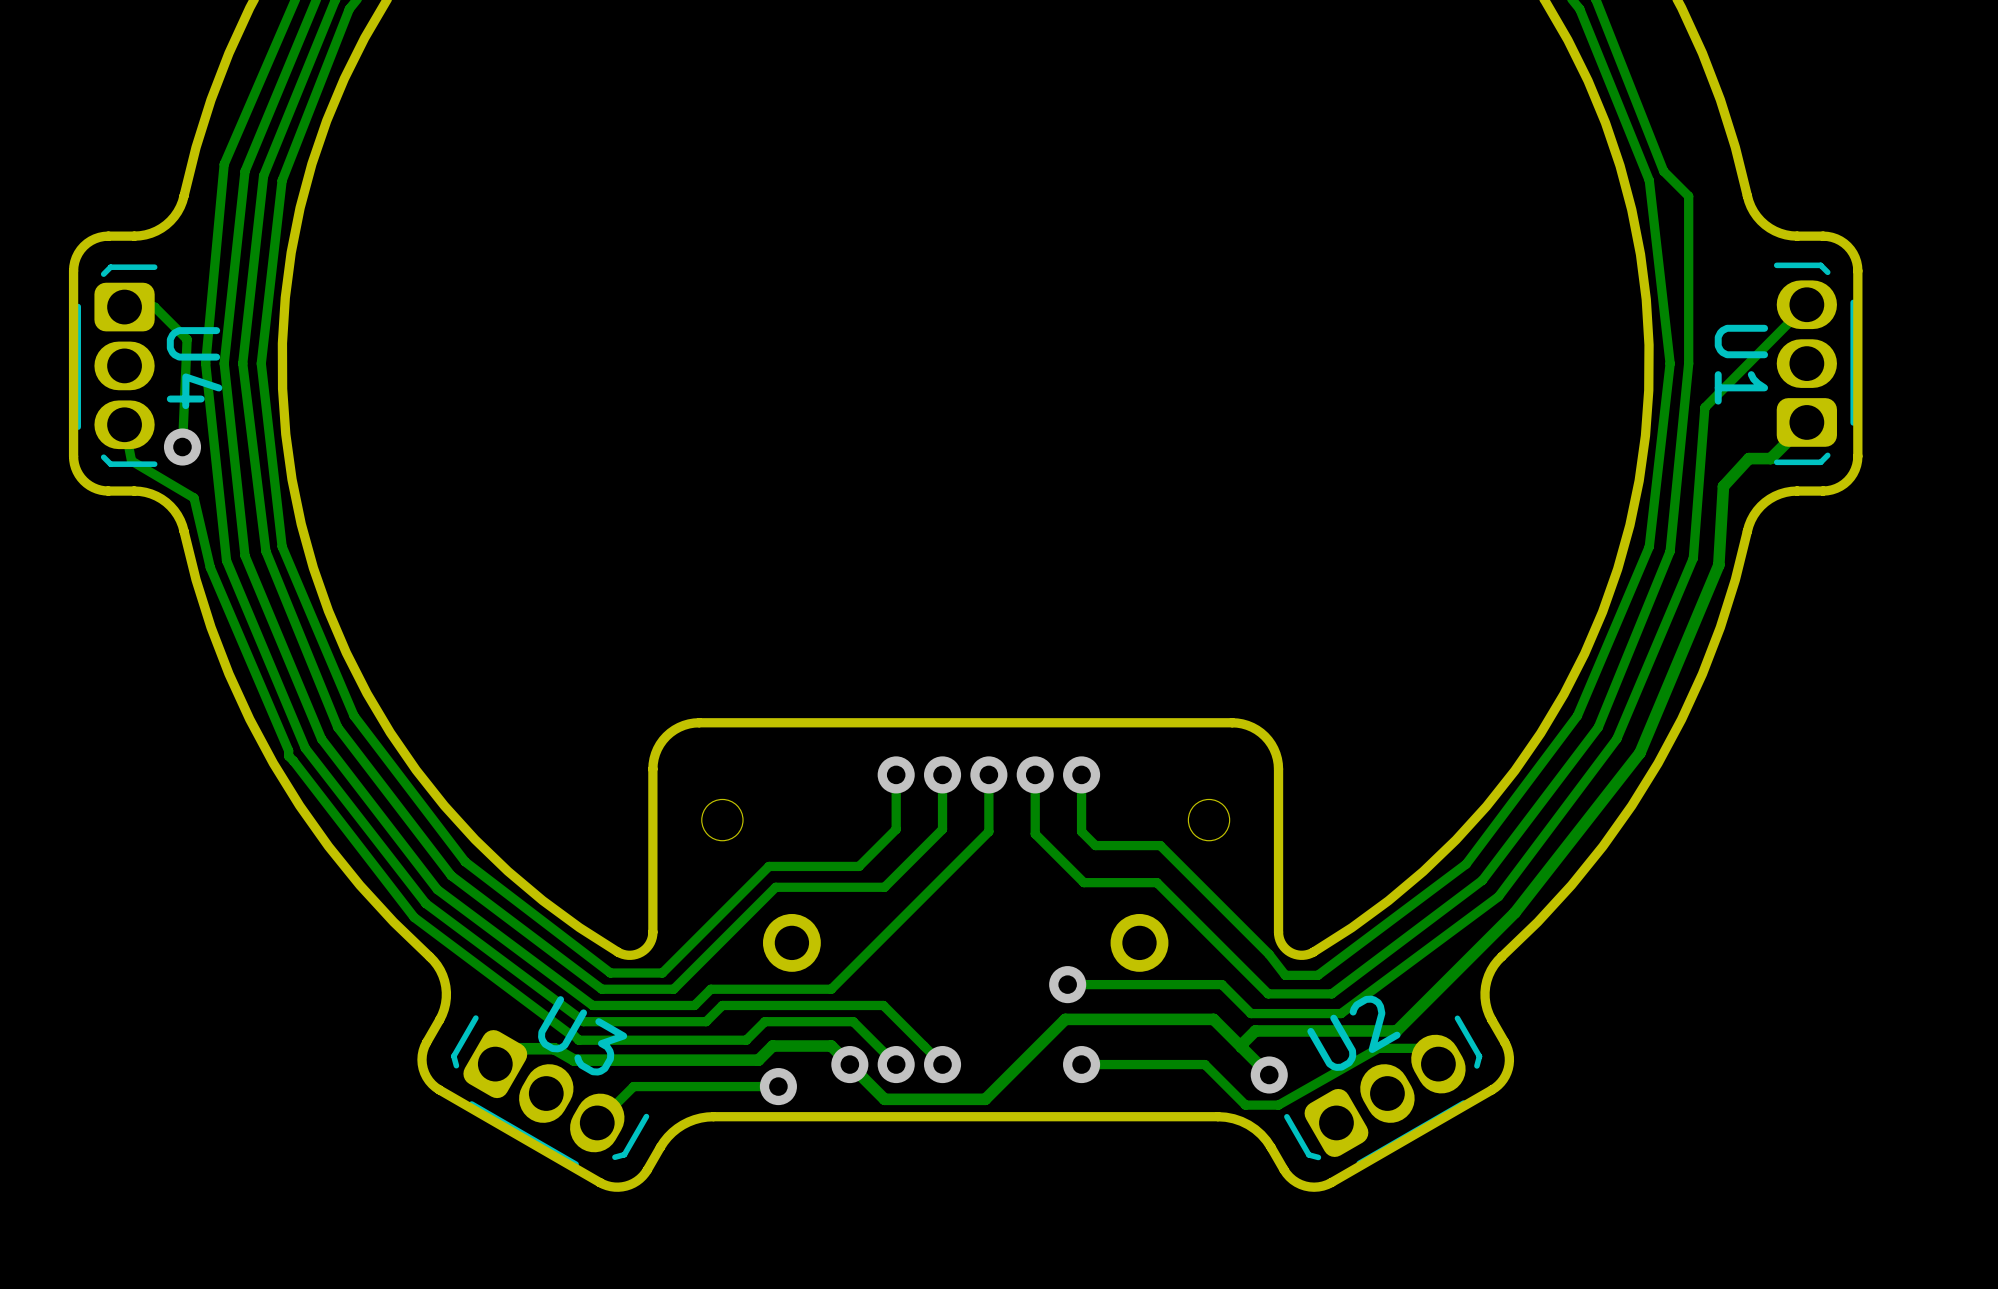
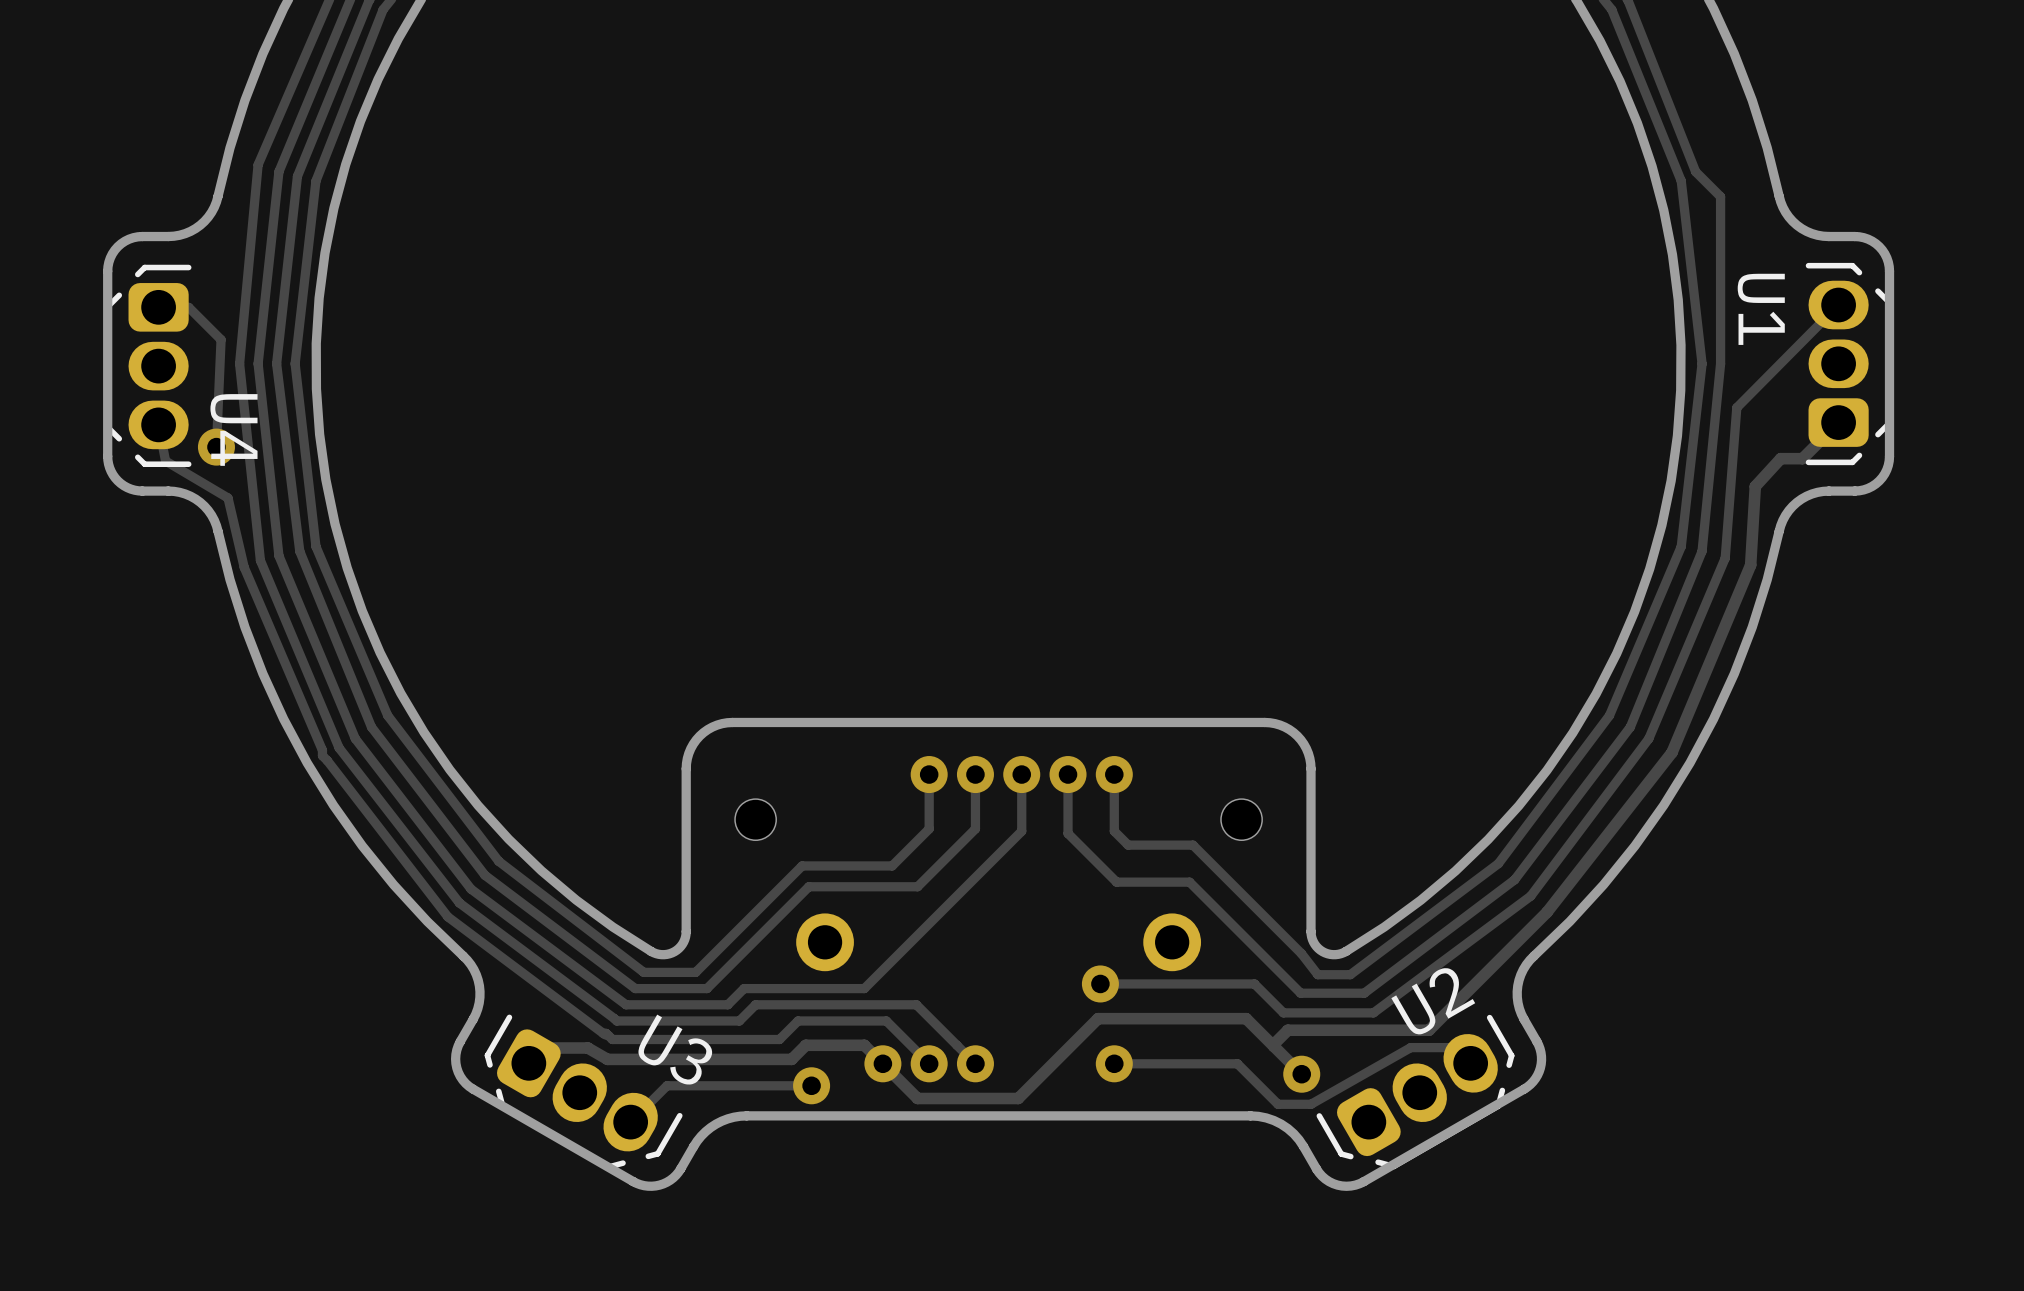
U1 footprint: [1773, 262, 1856, 466] -> [1805, 262, 1893, 466]
U4 footprint: [75, 264, 158, 467] -> [104, 264, 192, 468]
U1 name position: U1 (1741, 364) -> U1 (1761, 309)
U4 name position: U4 (194, 368) -> U4 (233, 429)
U3 footprint: [451, 1015, 650, 1168] -> [484, 1014, 683, 1171]
U2 footprint: [1284, 1015, 1483, 1167] -> [1316, 1014, 1515, 1170]
U2 name position: U2 (1353, 1033) -> U2 (1433, 1001)
U3 name position: U3 (582, 1035) -> U3 (675, 1049)

